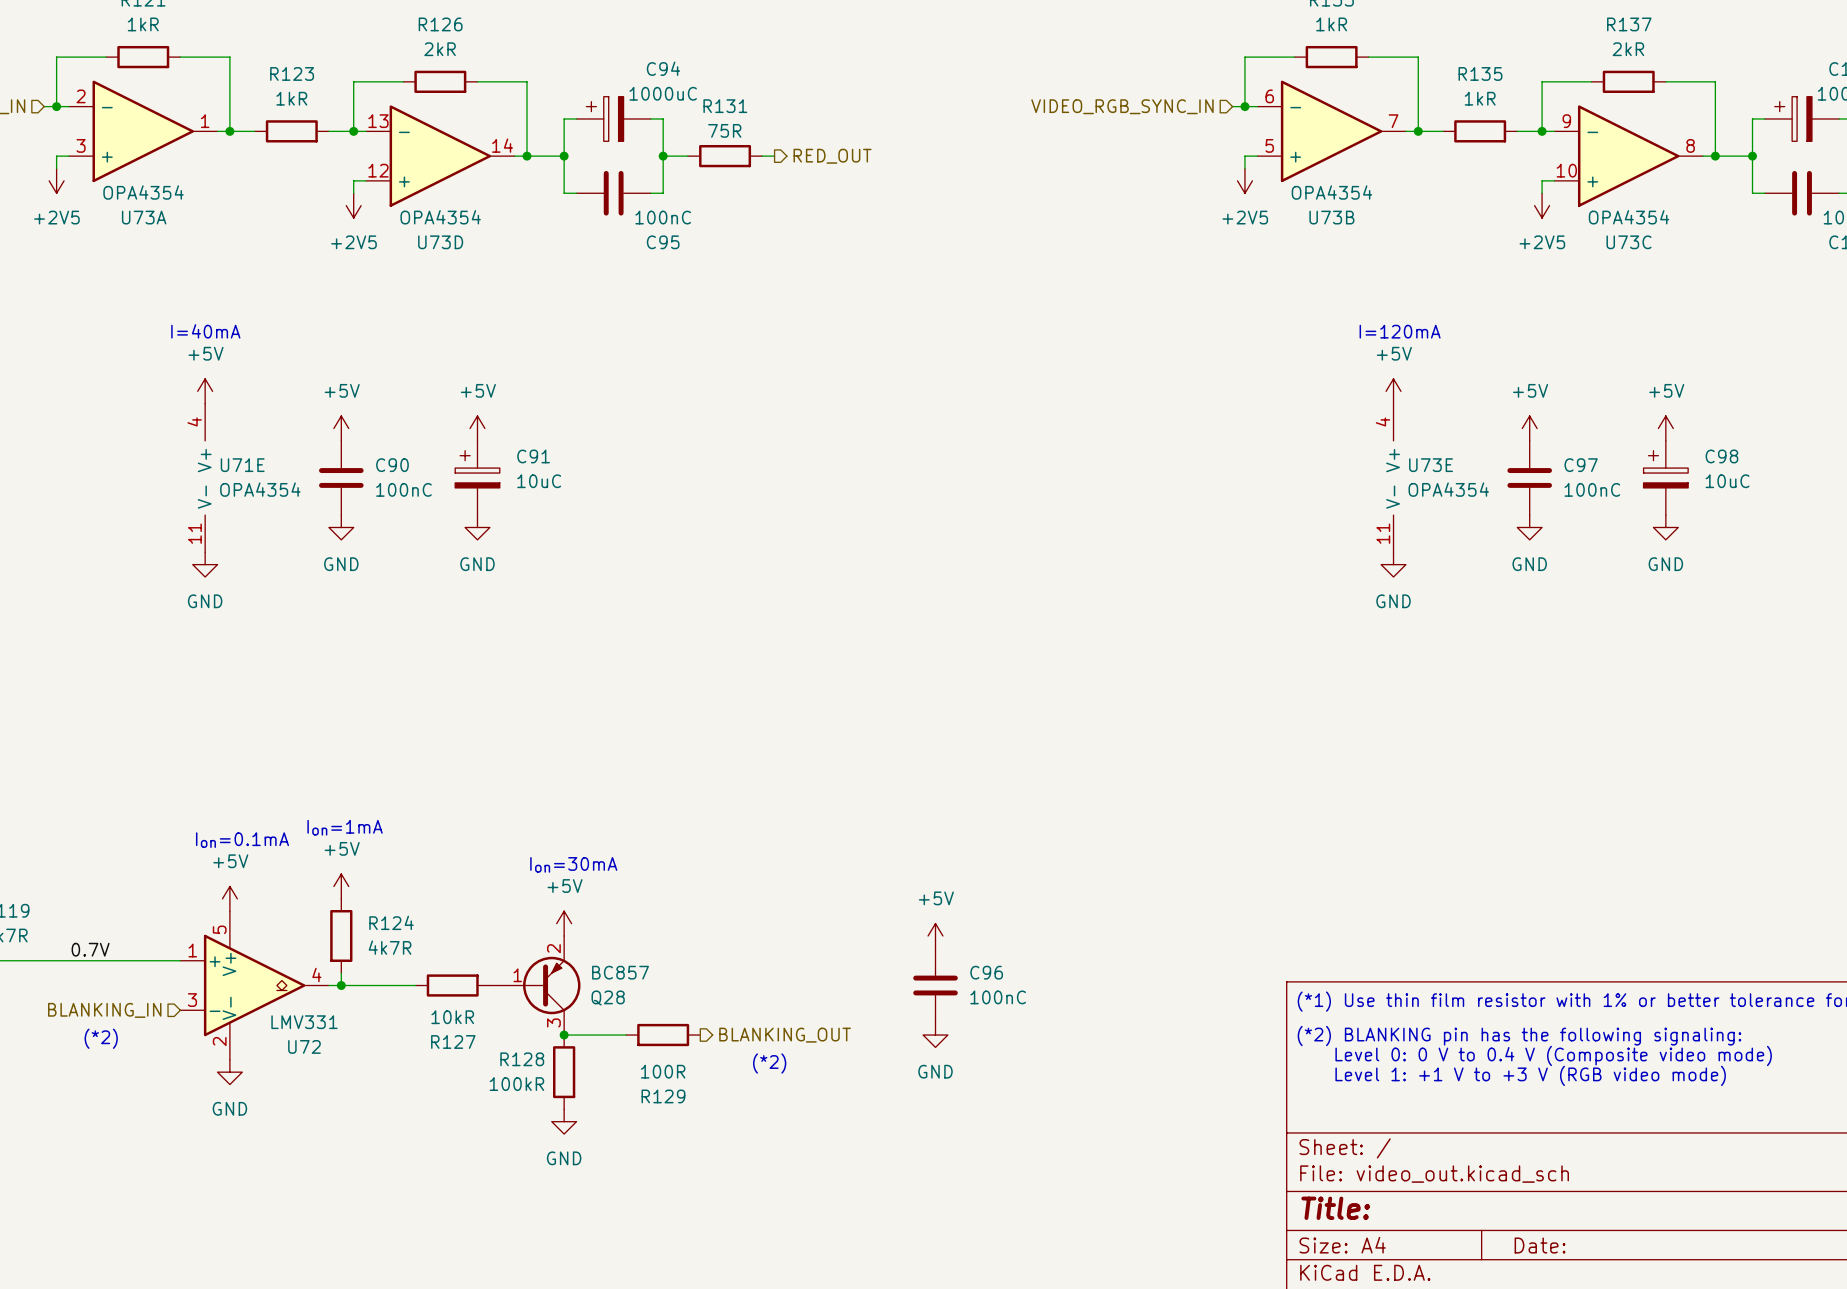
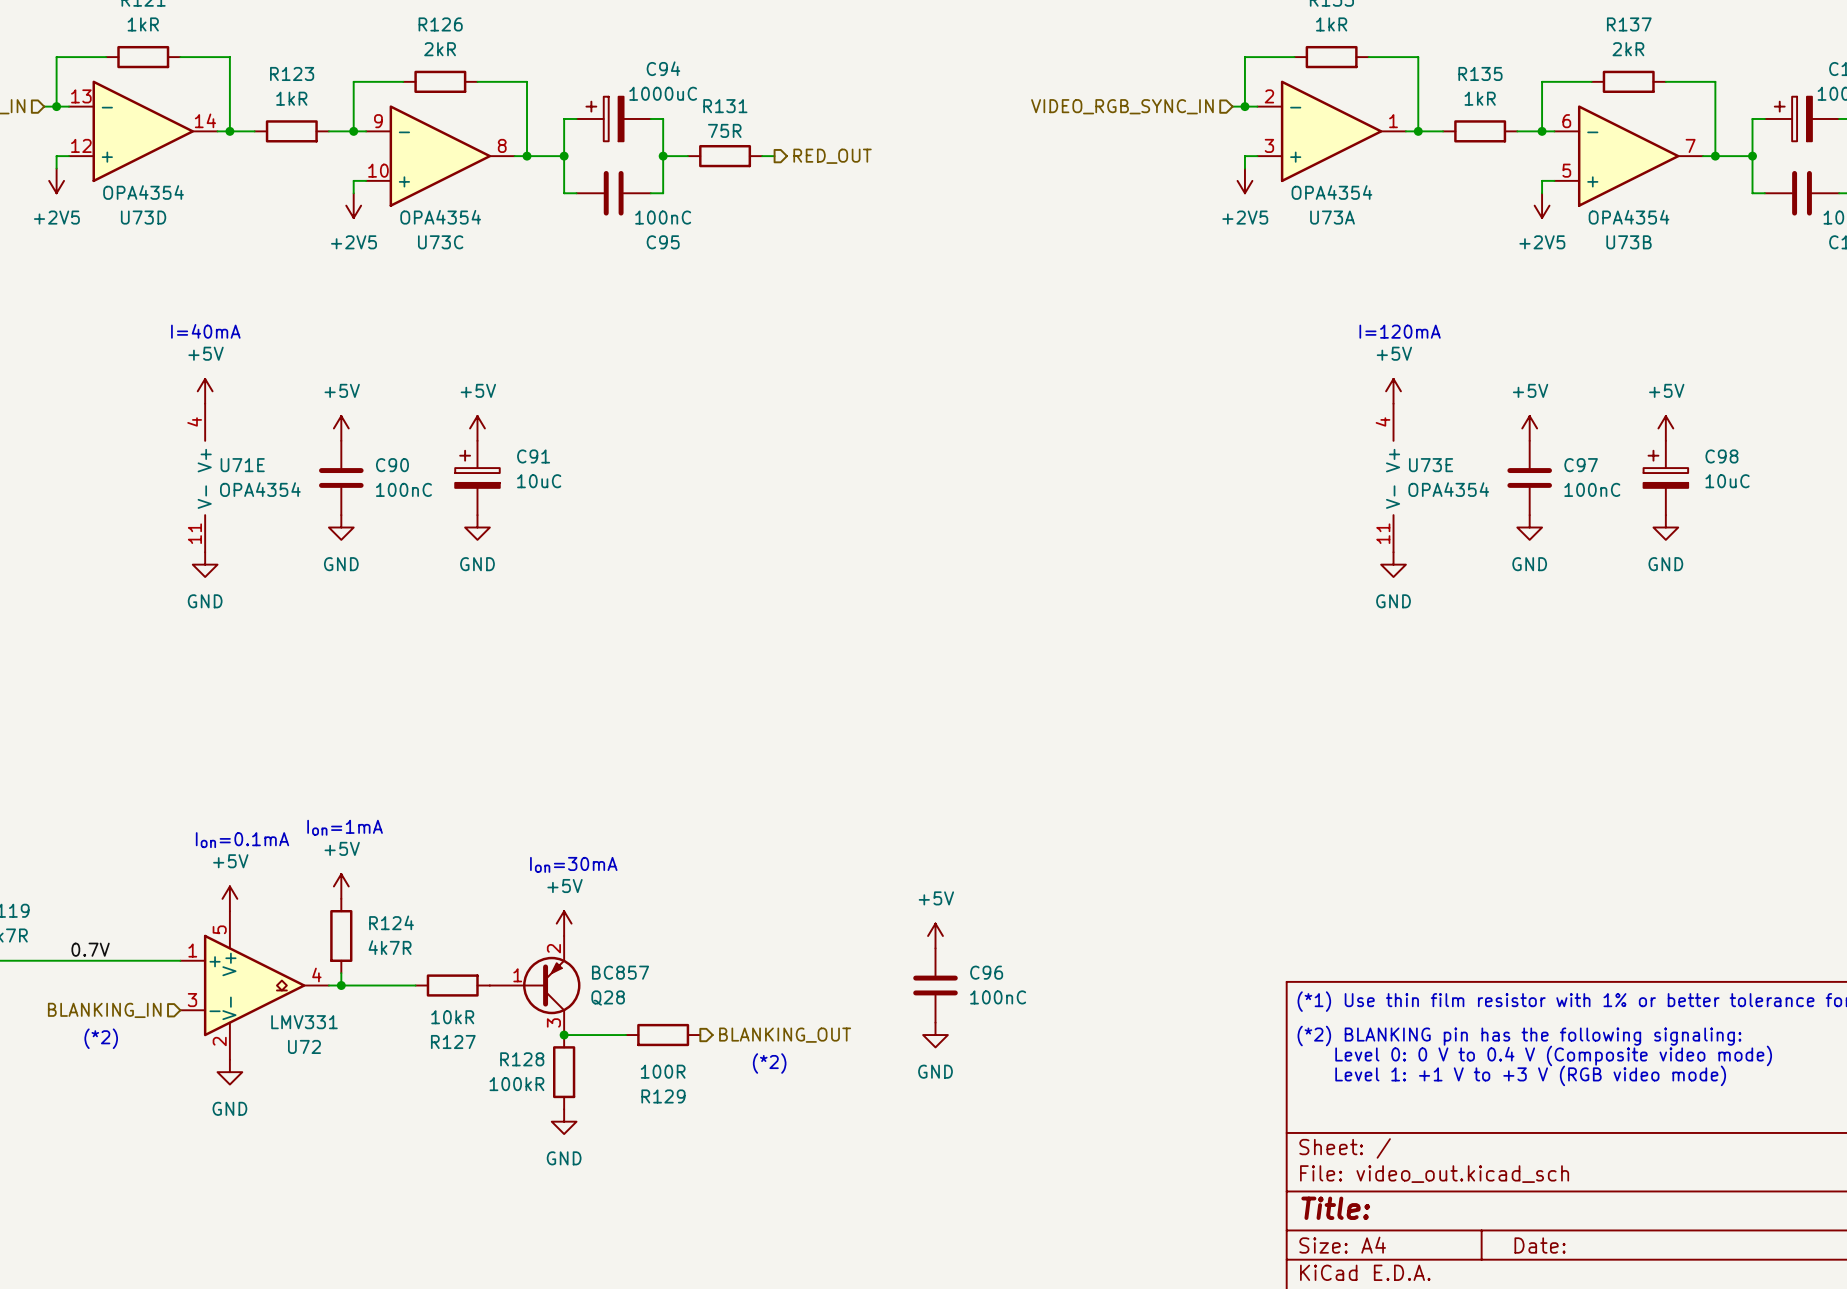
U73A position: (143, 131) -> (1331, 131)
U73B position: (1331, 131) -> (1628, 156)
U73D position: (440, 156) -> (143, 131)
U73C position: (1628, 156) -> (440, 156)

